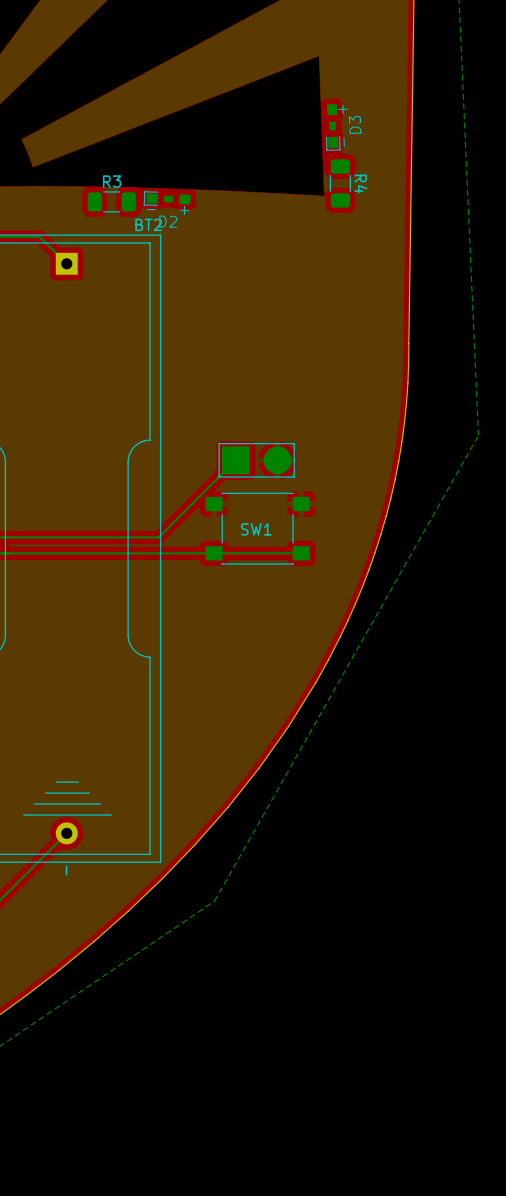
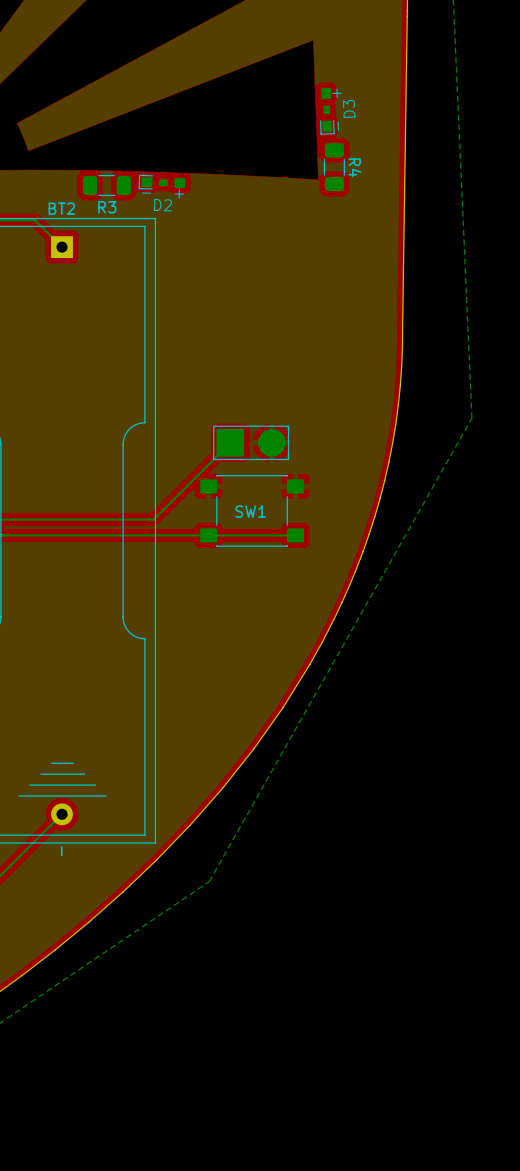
R3 name position: R3 (112, 181) -> R3 (107, 207)
BT2 name position: BT2 (148, 224) -> BT2 (61, 208)

